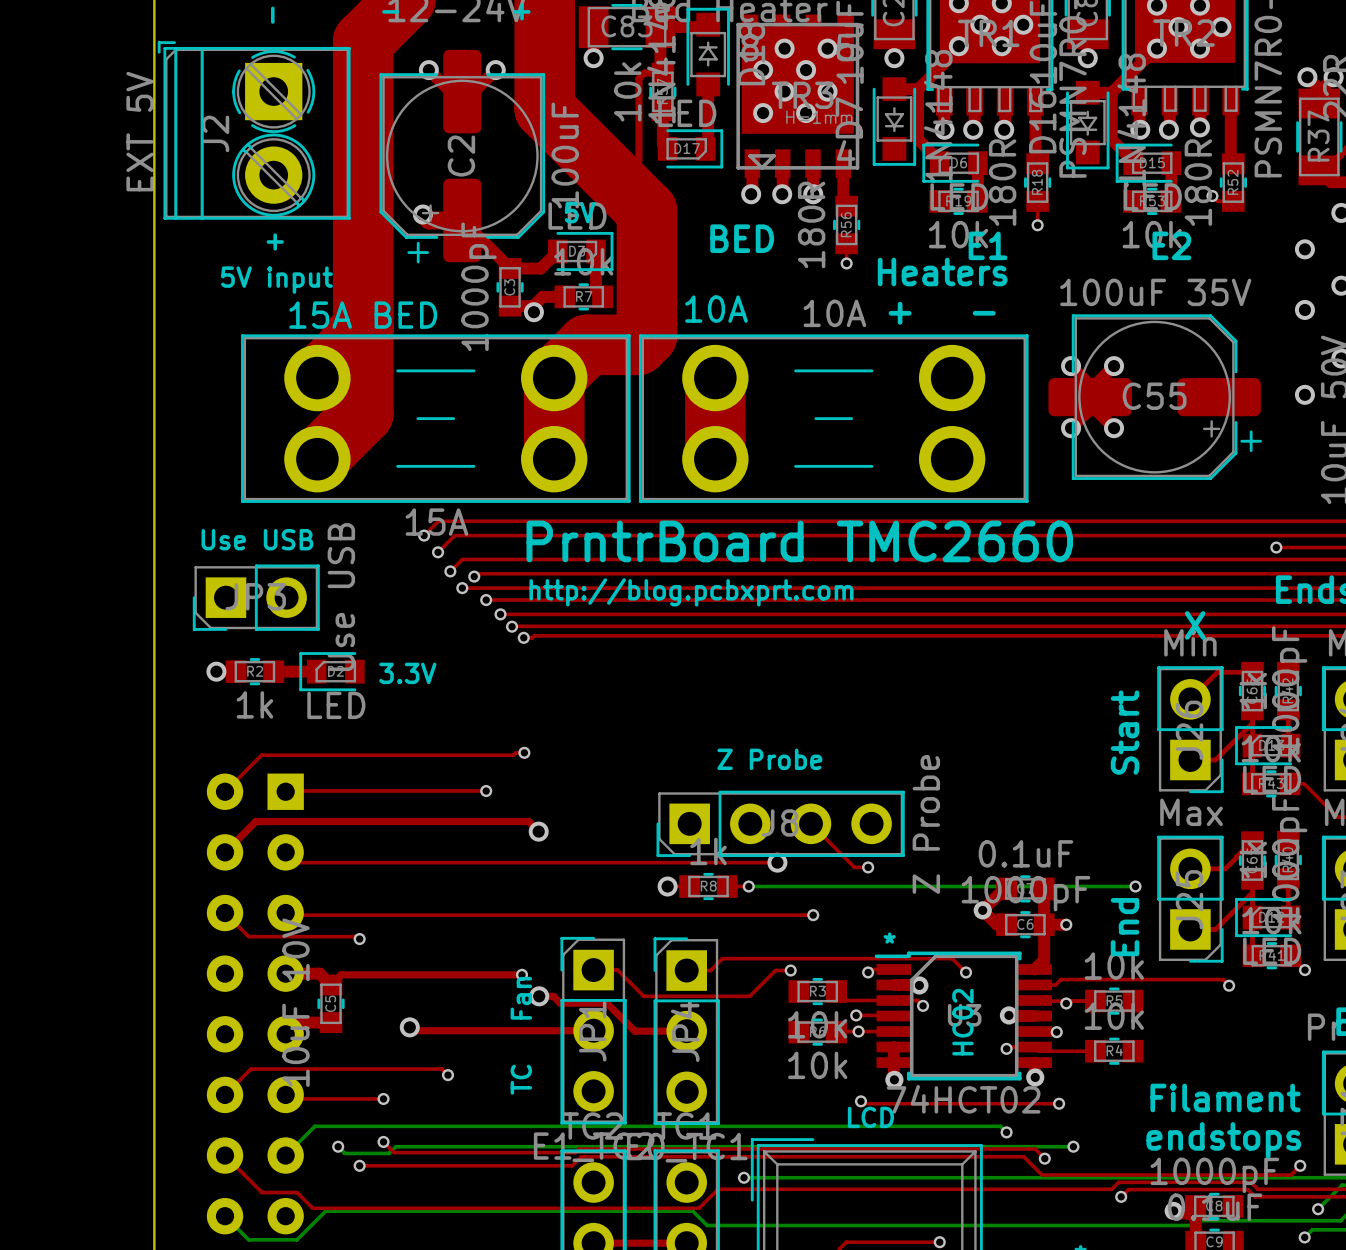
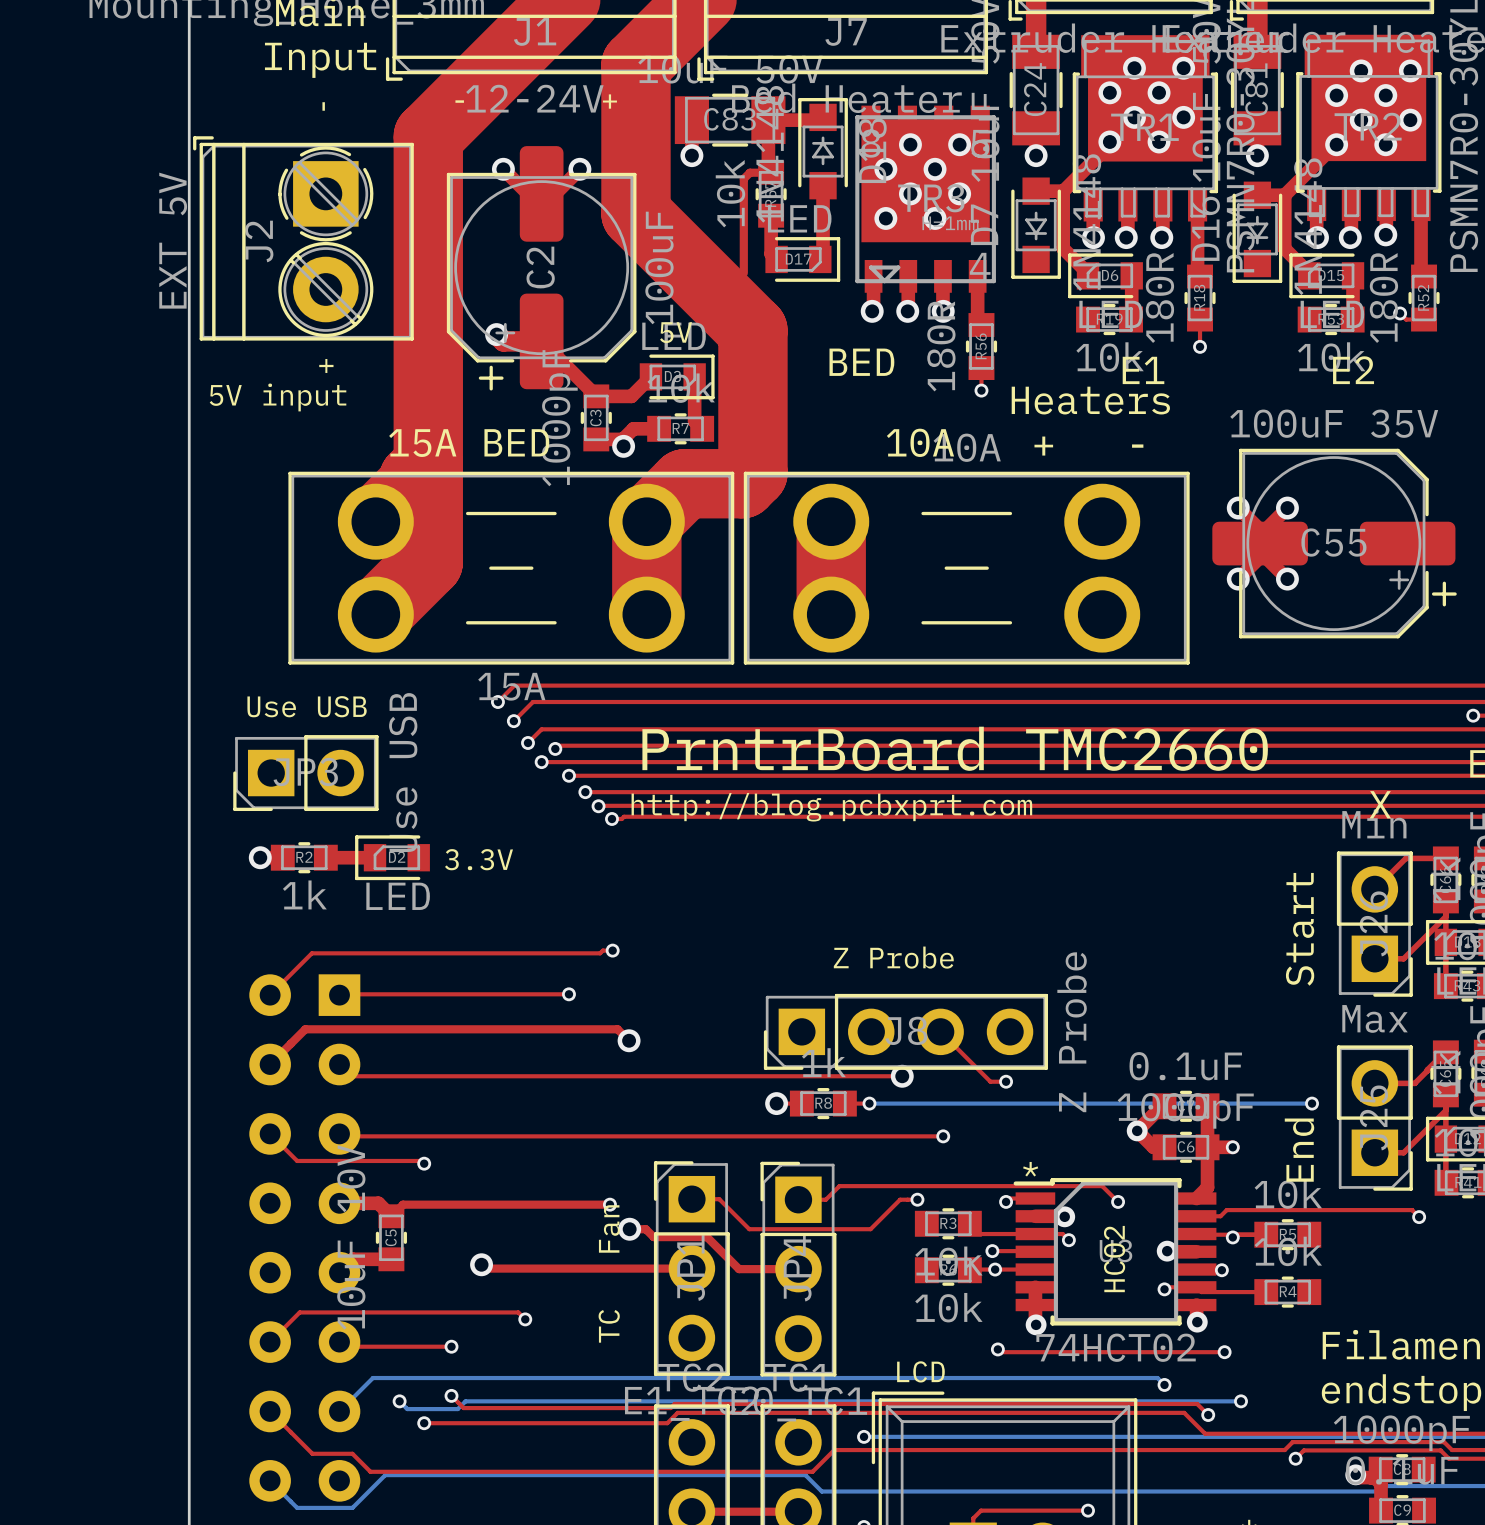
text position: 5V input (276, 280) -> 5V input (278, 397)
10A name position: 10A (716, 309) -> 10A (920, 442)
15A BED name position: 15A BED (363, 315) -> 15A BED (469, 443)
text position: PrntrBoard TMC2660 (799, 541) -> PrntrBoard TMC2660 (955, 748)
text position: http://blog.pcbxprt.com (691, 592) -> http://blog.pcbxprt.com (831, 807)
text position: LCD (870, 1117) -> LCD (920, 1371)

